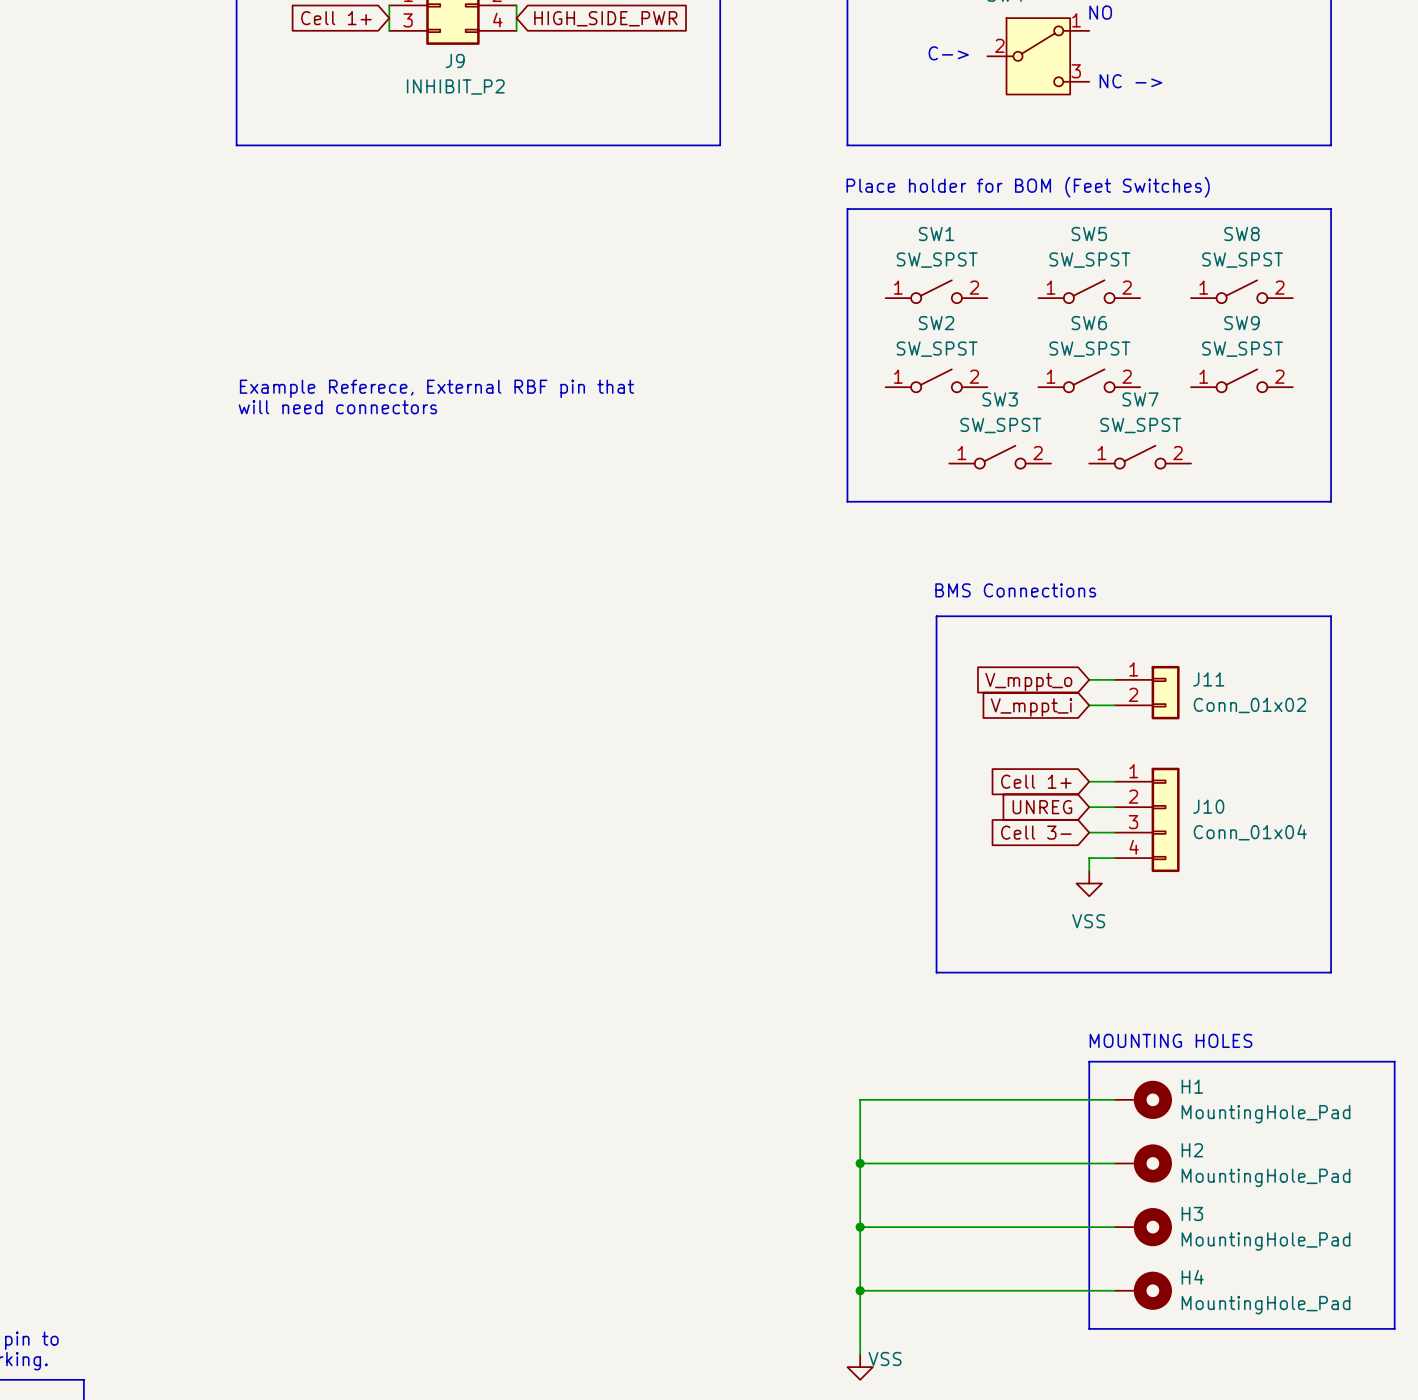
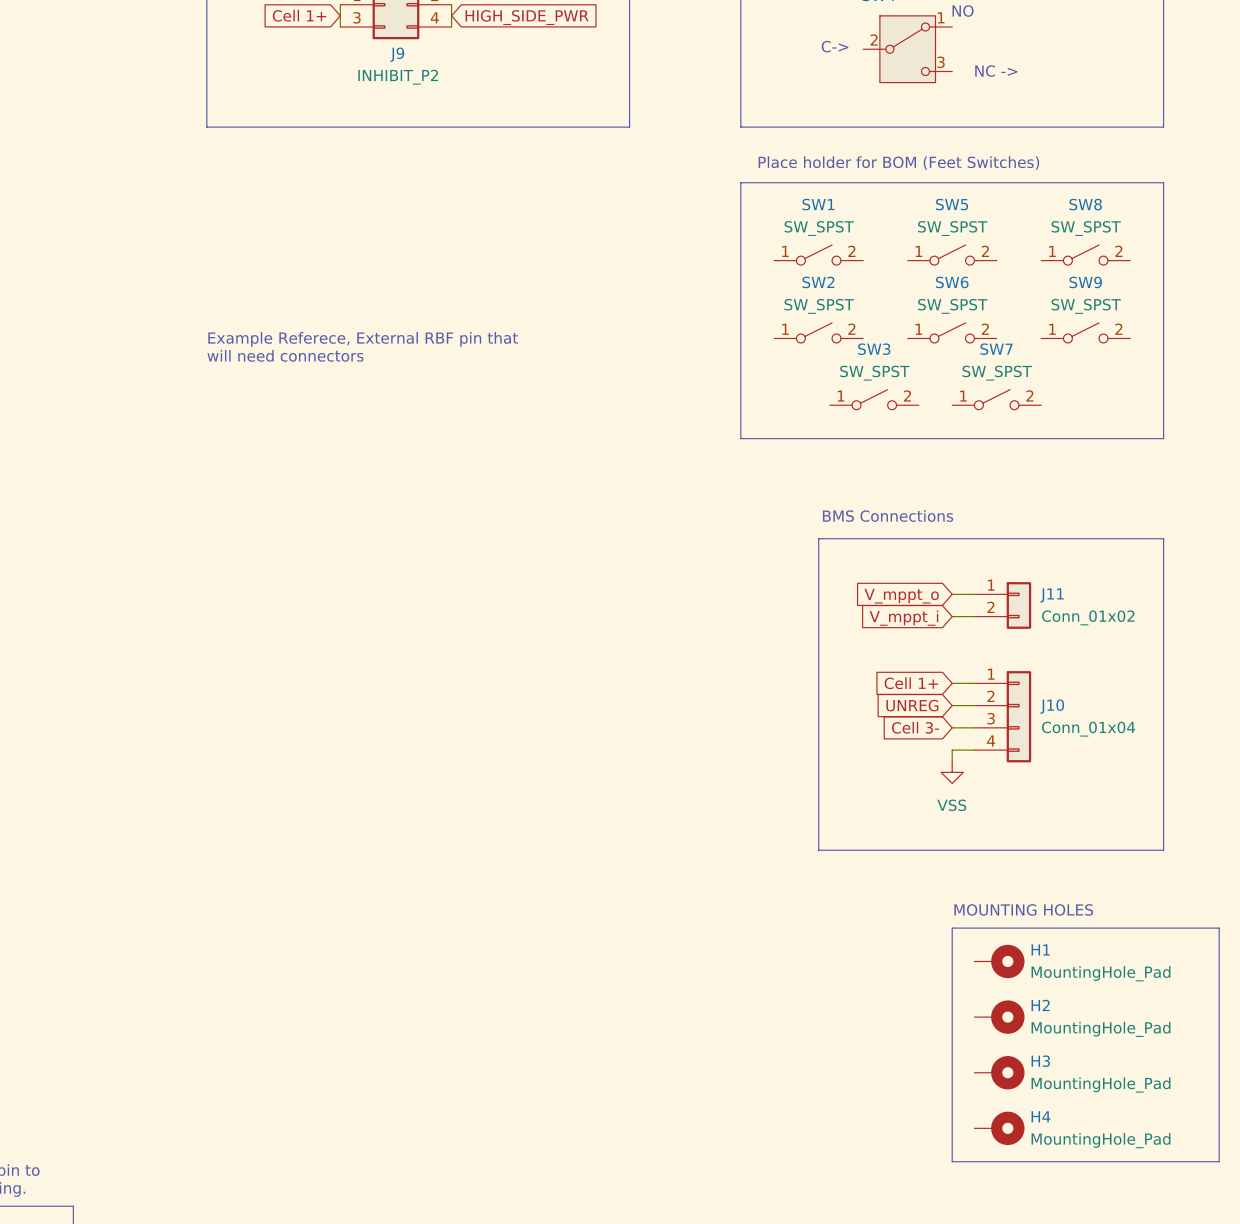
wire: (1114, 1099) (860, 1099) (860, 1354) -> none
wire: (860, 1163) (1114, 1163) -> none
junction: (860, 1163) -> none
wire: (860, 1227) (1114, 1227) -> none
junction: (860, 1227) -> none
wire: (860, 1290) (1114, 1290) -> none
junction: (860, 1290) -> none
power symbol: VSS (860, 1367) -> none

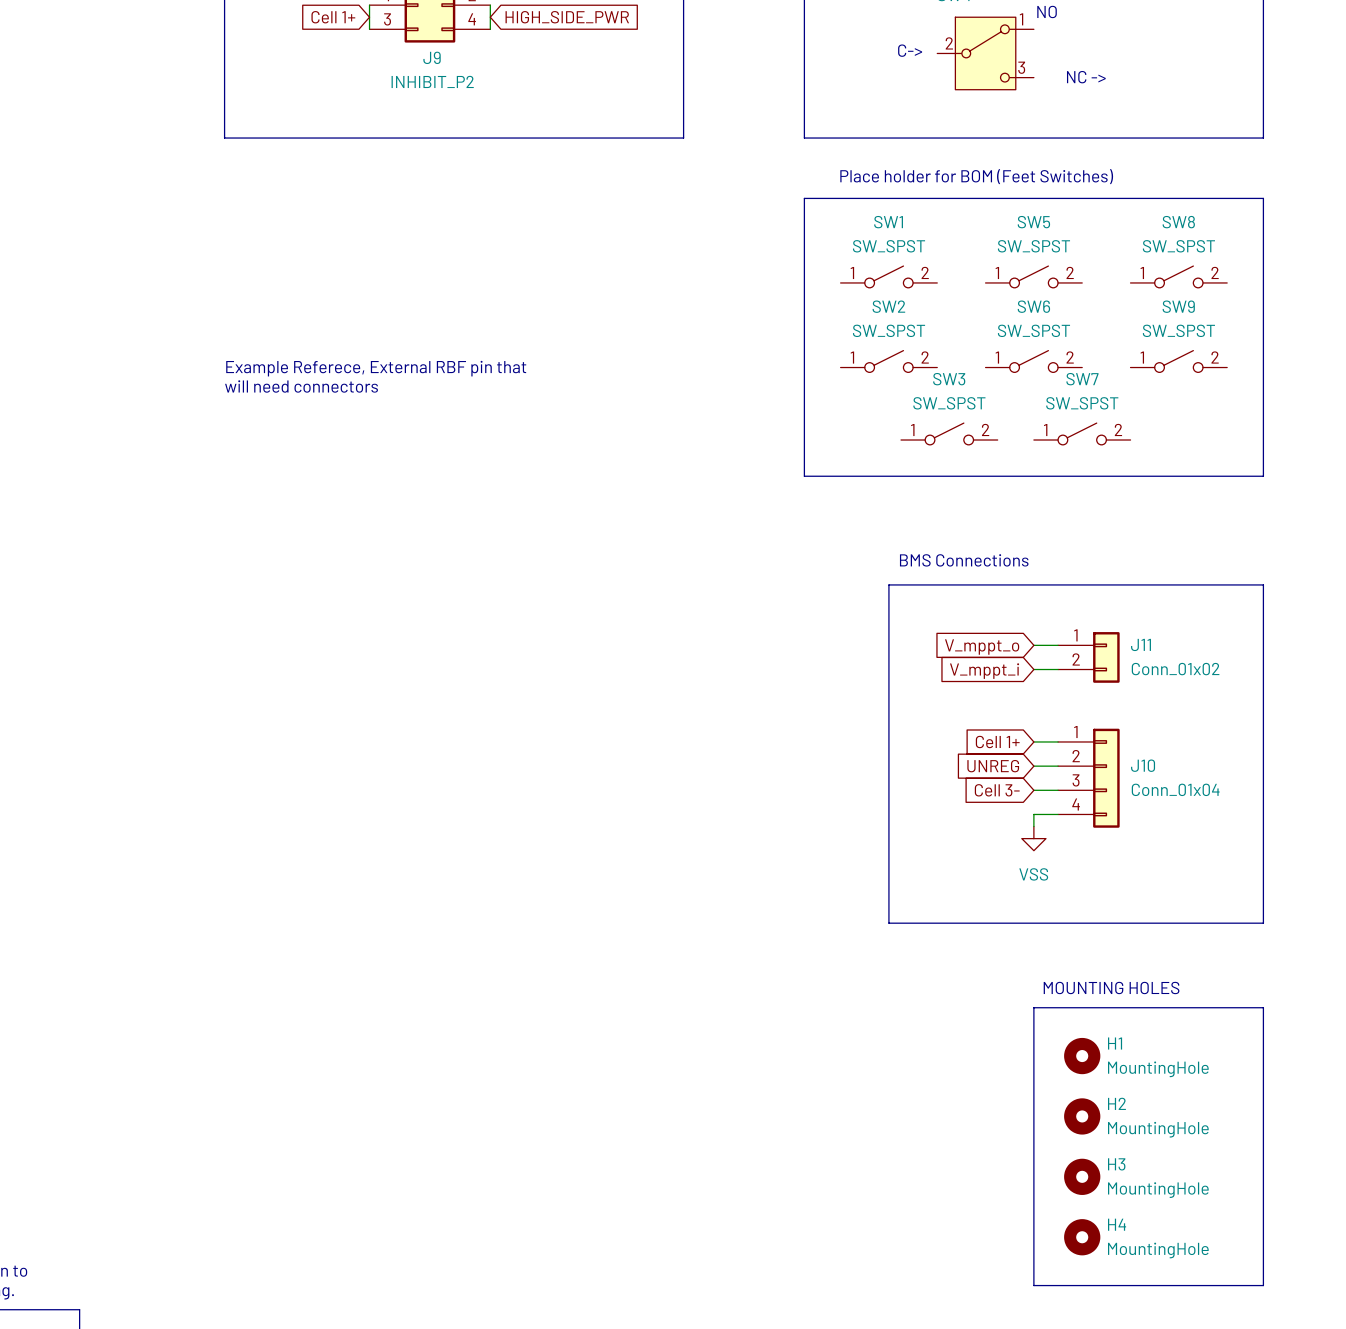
line: (1163, 928) (1219, 928) (1219, 1161) (952, 1161) -> (1263, 1007) (1263, 1285) (1033, 1285) (1033, 1261)
H1 symbol: [974, 944, 1025, 979] -> [1064, 1037, 1101, 1075]
H1 value: MountingHole_Pad (1100, 973) -> MountingHole (1158, 1069)
H2 symbol: [974, 1000, 1025, 1034] -> [1064, 1098, 1101, 1135]
H2 value: MountingHole_Pad (1100, 1029) -> MountingHole (1158, 1129)
H3 symbol: [974, 1056, 1025, 1090] -> [1064, 1158, 1101, 1195]
H3 value: MountingHole_Pad (1100, 1085) -> MountingHole (1158, 1190)
H4 symbol: [974, 1111, 1025, 1146] -> [1064, 1219, 1101, 1256]
H4 value: MountingHole_Pad (1100, 1140) -> MountingHole (1158, 1250)

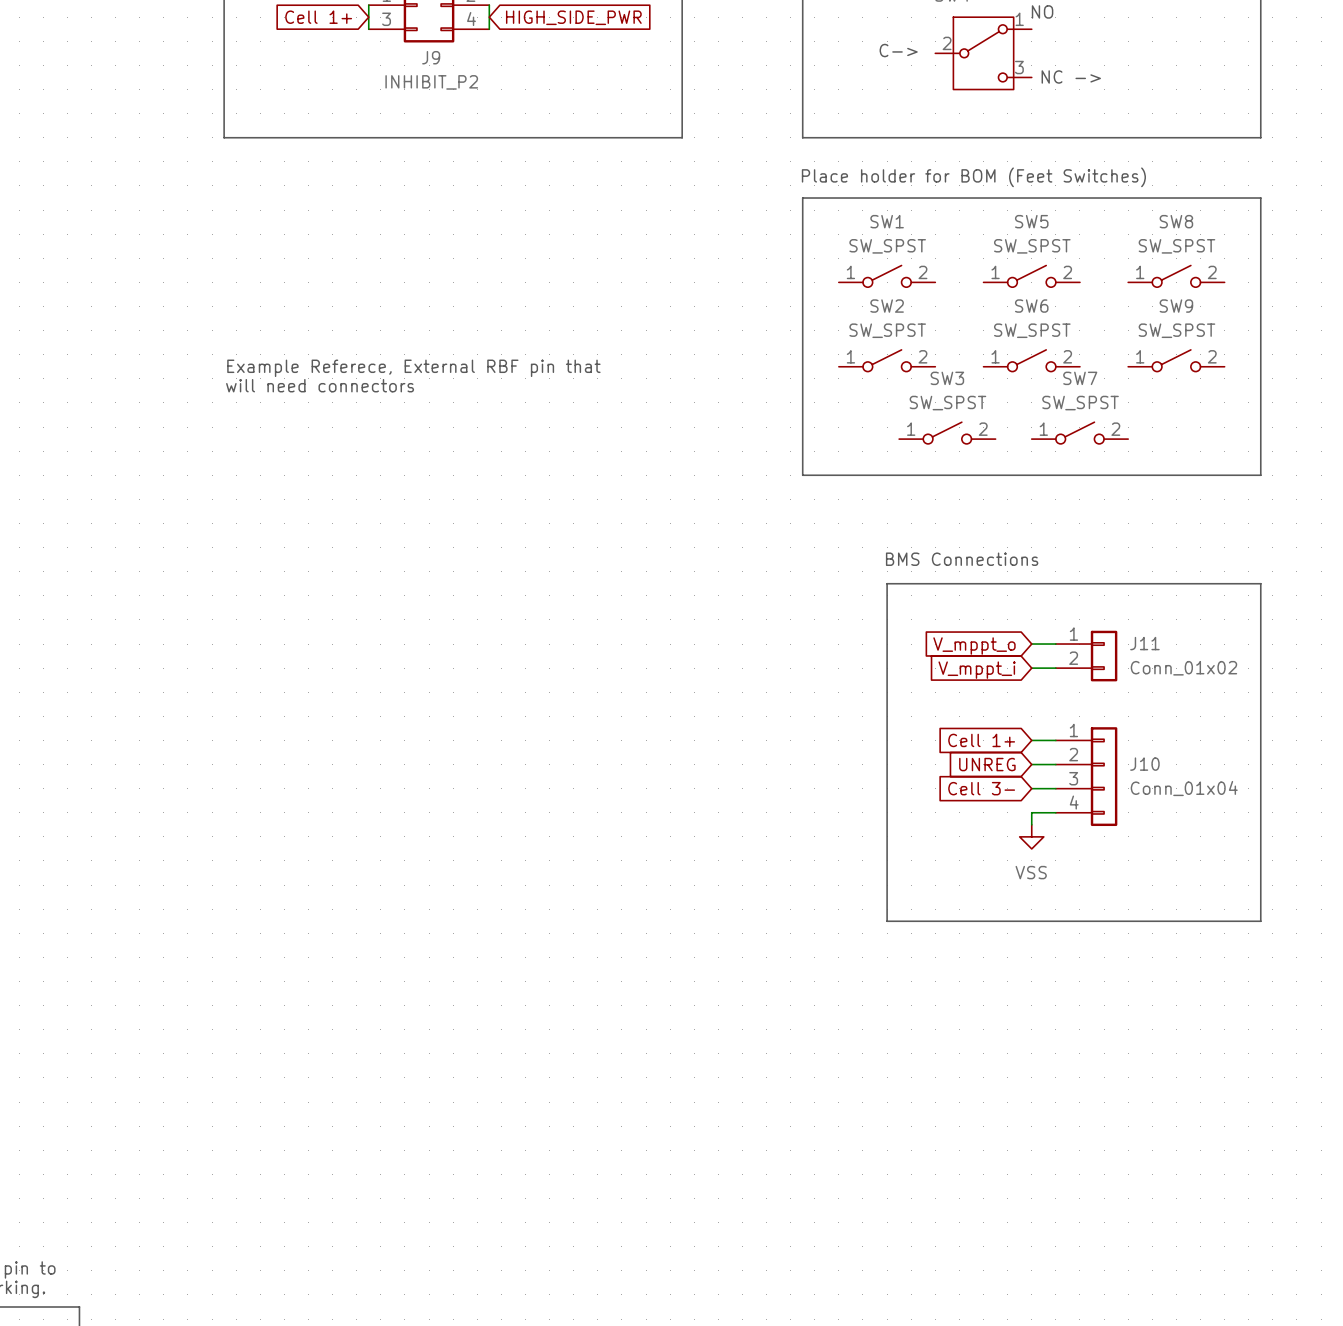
text: MOUNTING HOLES (1111, 987) -> none
line: (1033, 1007) (1263, 1007) (1263, 1285) (1033, 1285) (1033, 1007) -> none
H1: MountingHole (1082, 1056) -> none
H2: MountingHole (1082, 1116) -> none
H3: MountingHole (1082, 1176) -> none
H4: MountingHole (1082, 1237) -> none

